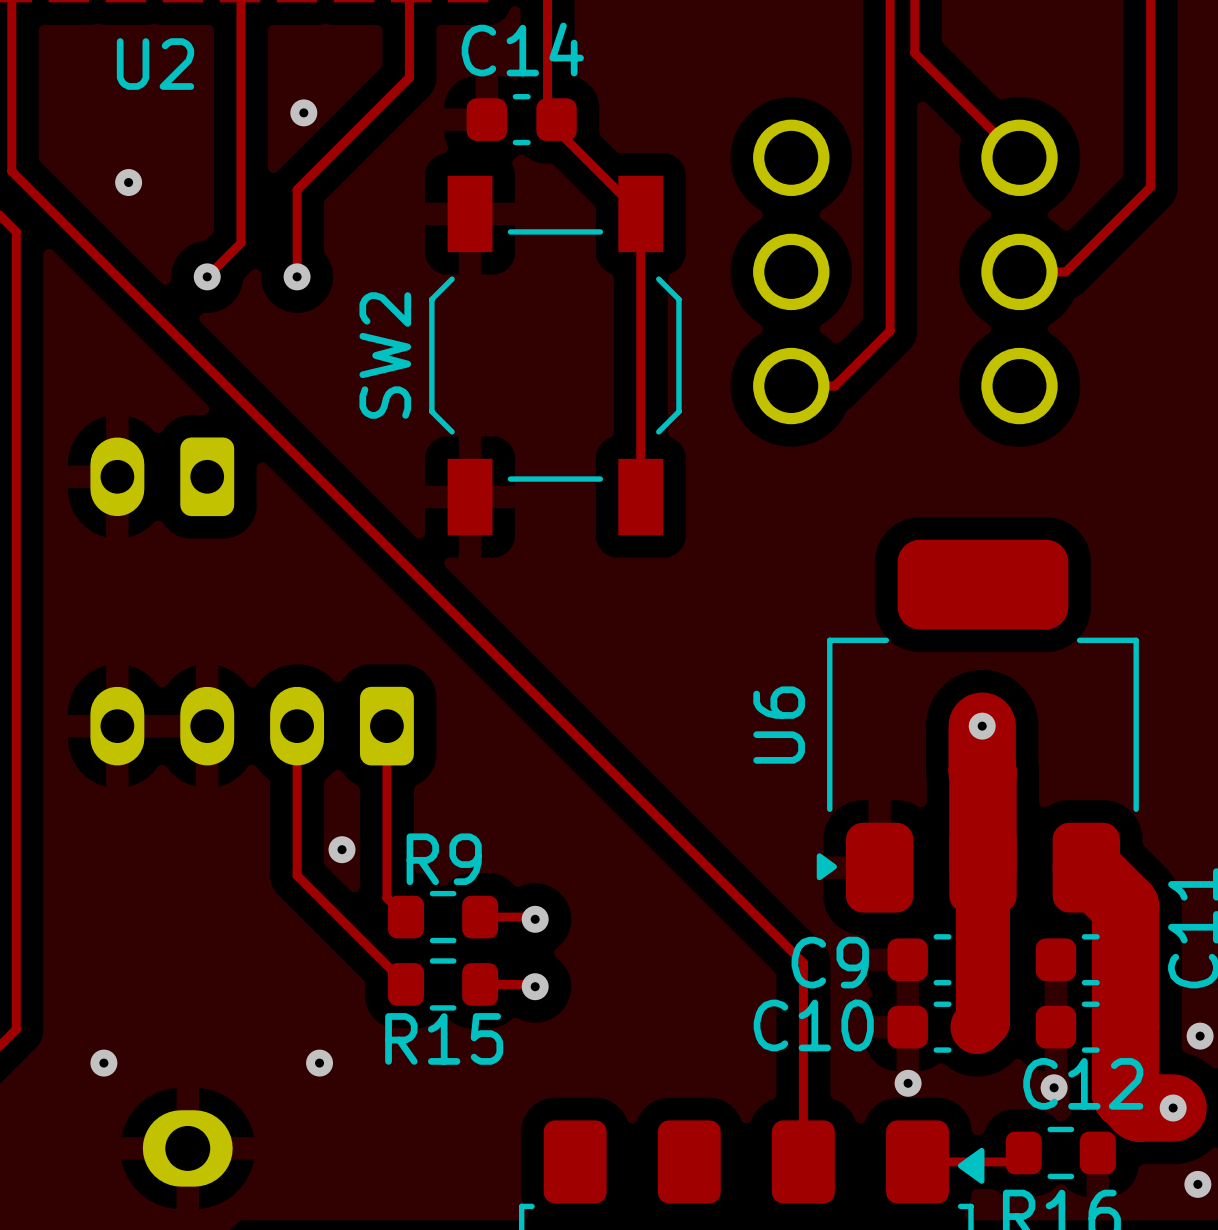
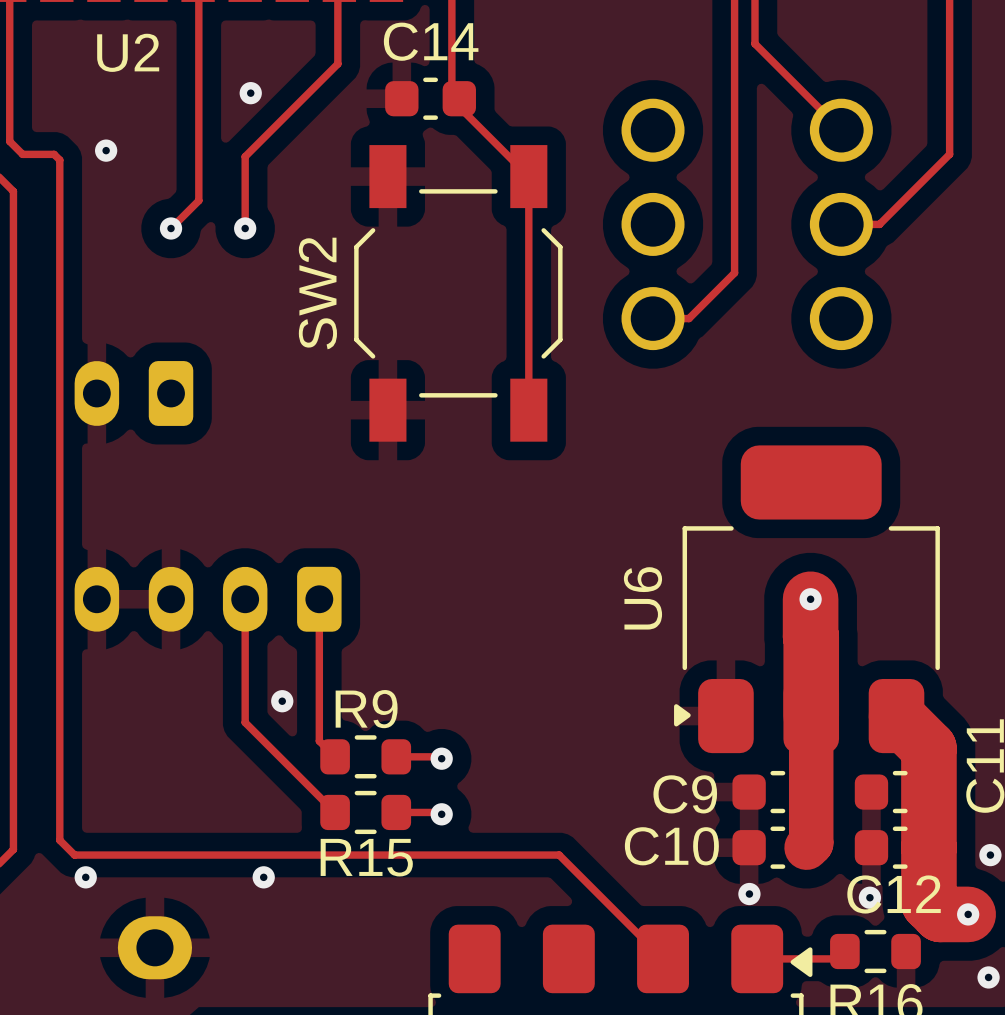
track: (27, 187) (803, 962) (803, 1161) -> (22, 154) (54, 154) (59, 160) (59, 840) (74, 855) (559, 855) (663, 958)

